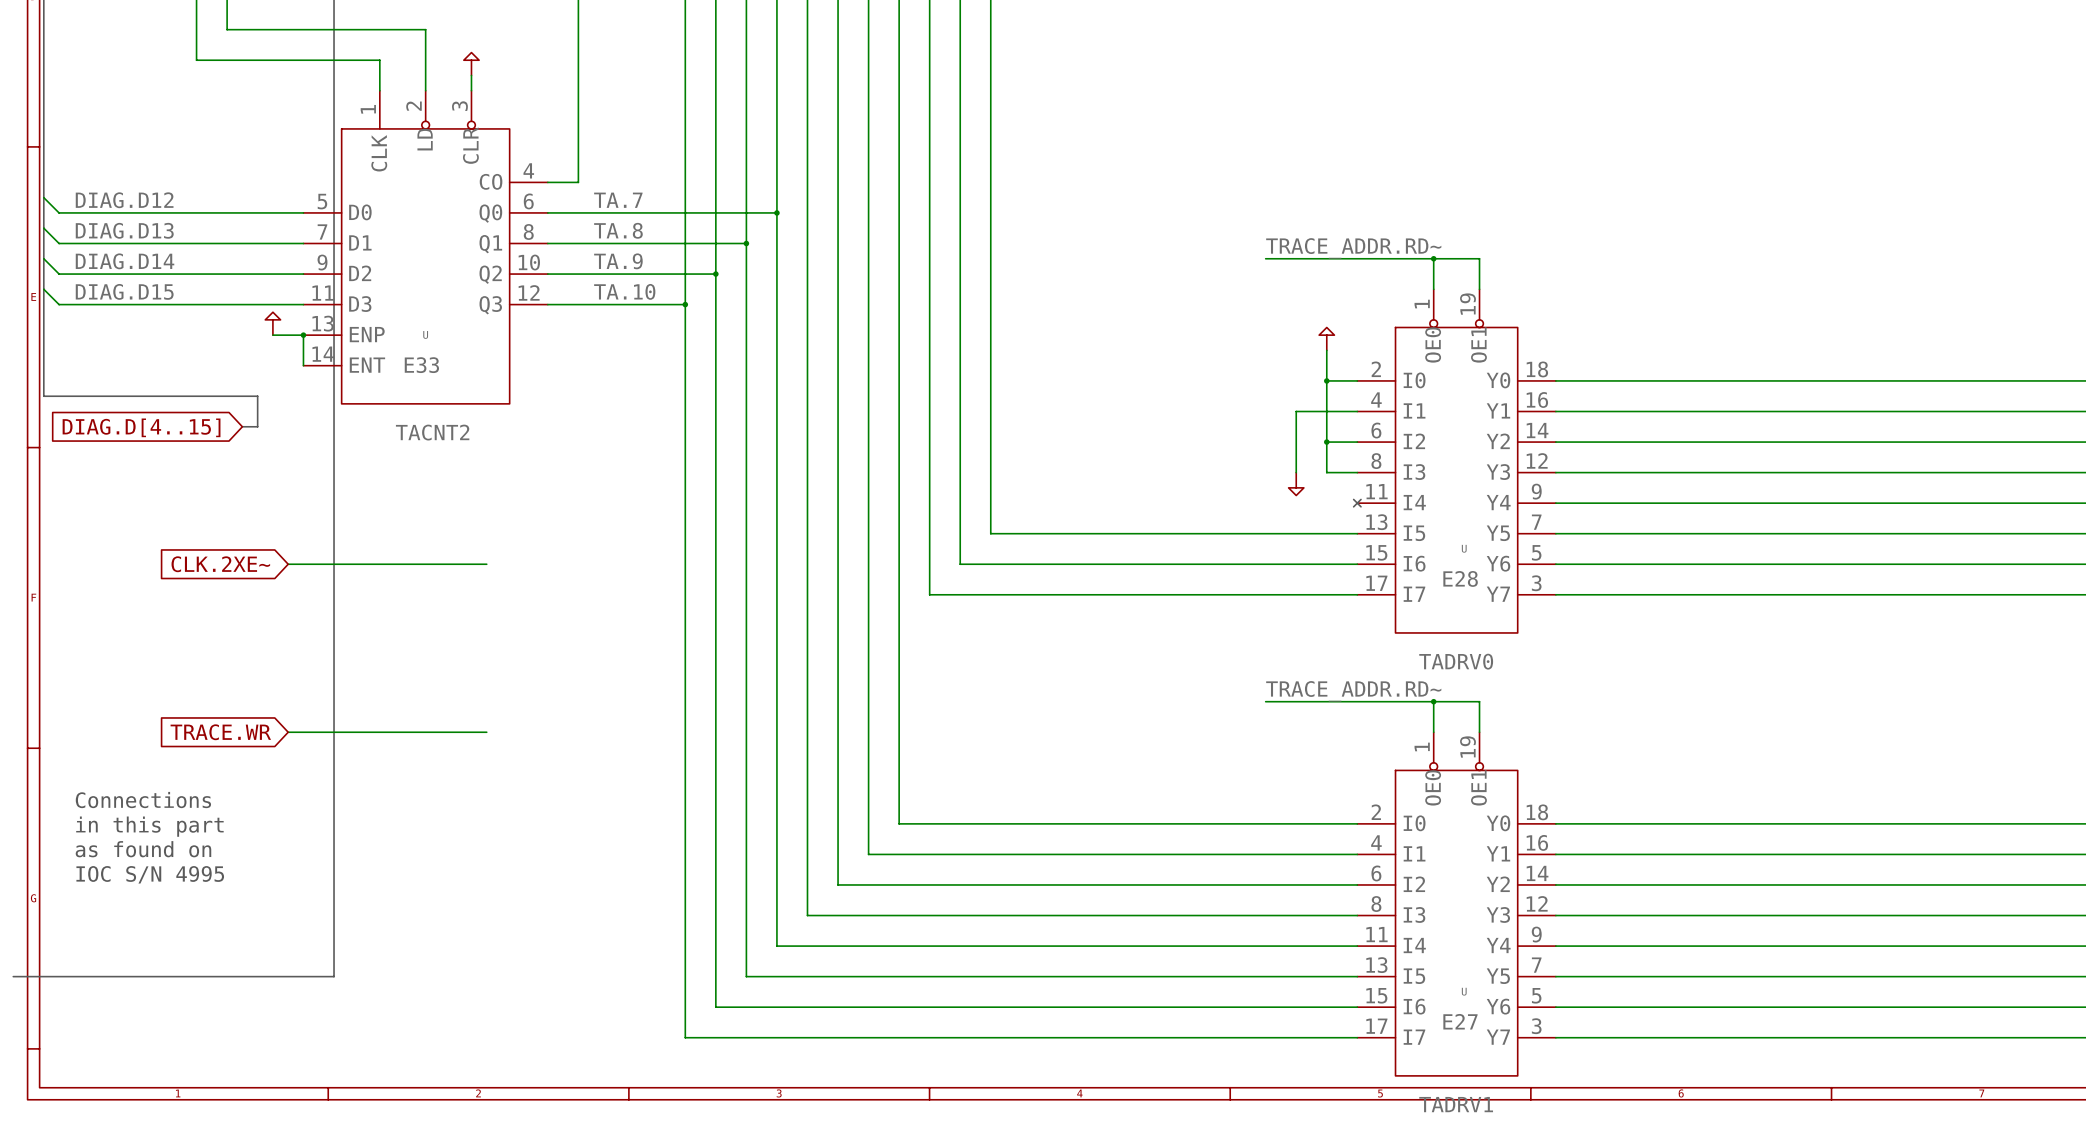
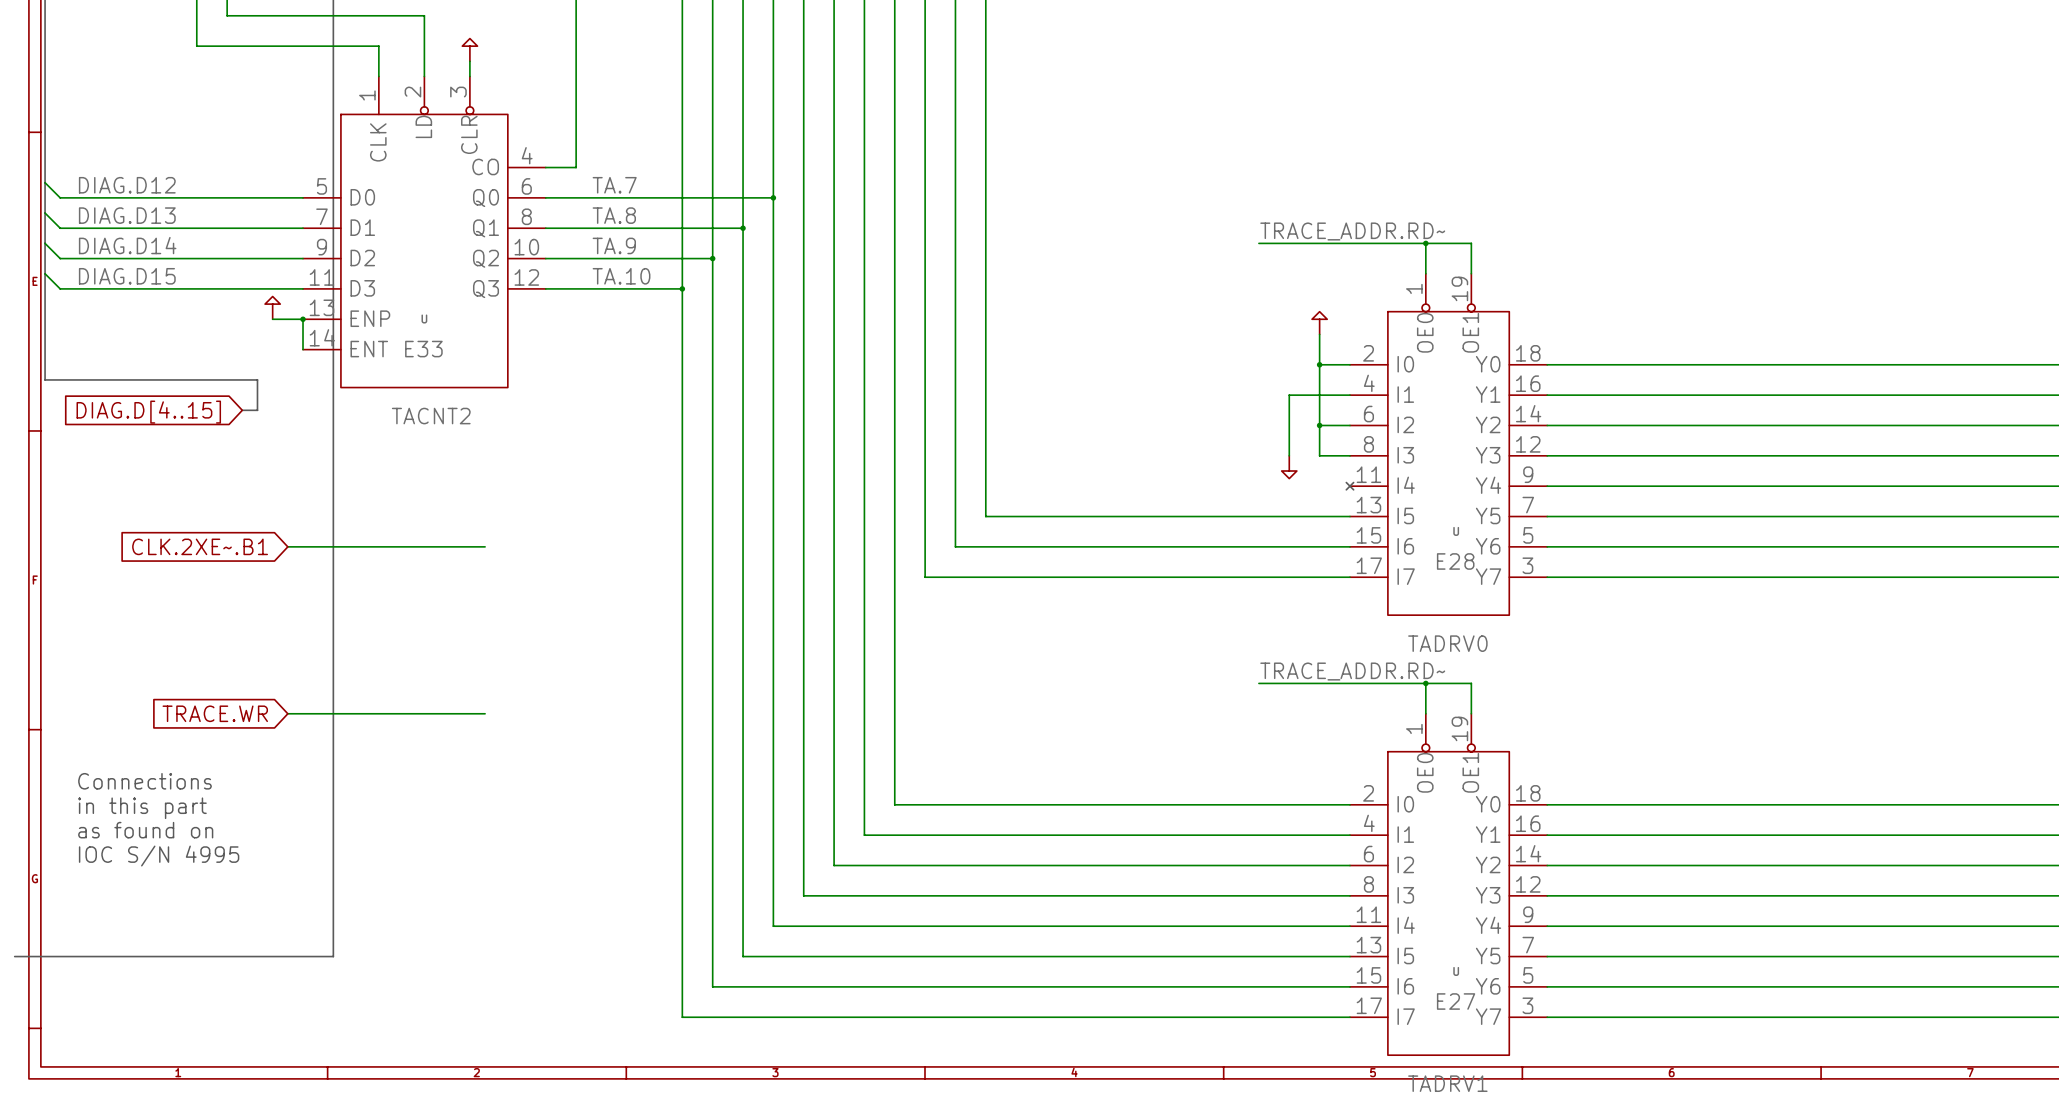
global label: CLK.2XE~ (220, 564) -> CLK.2XE~.B1 (200, 546)

